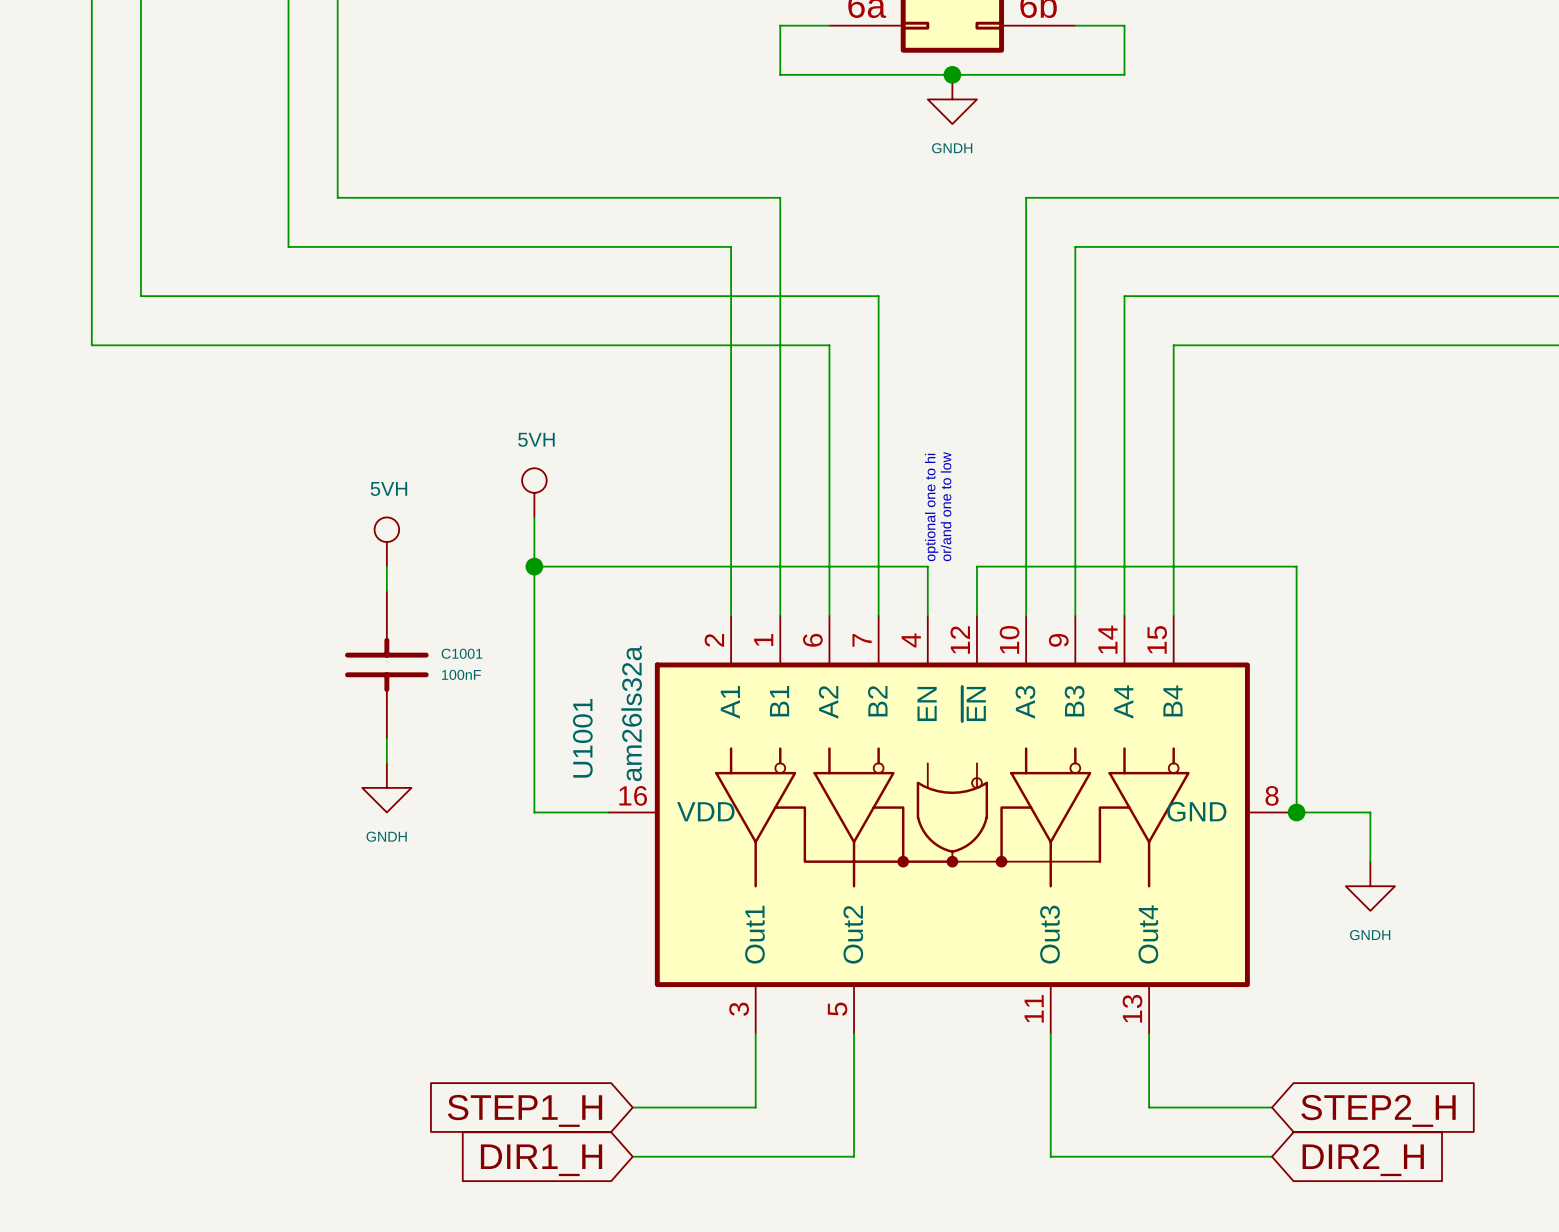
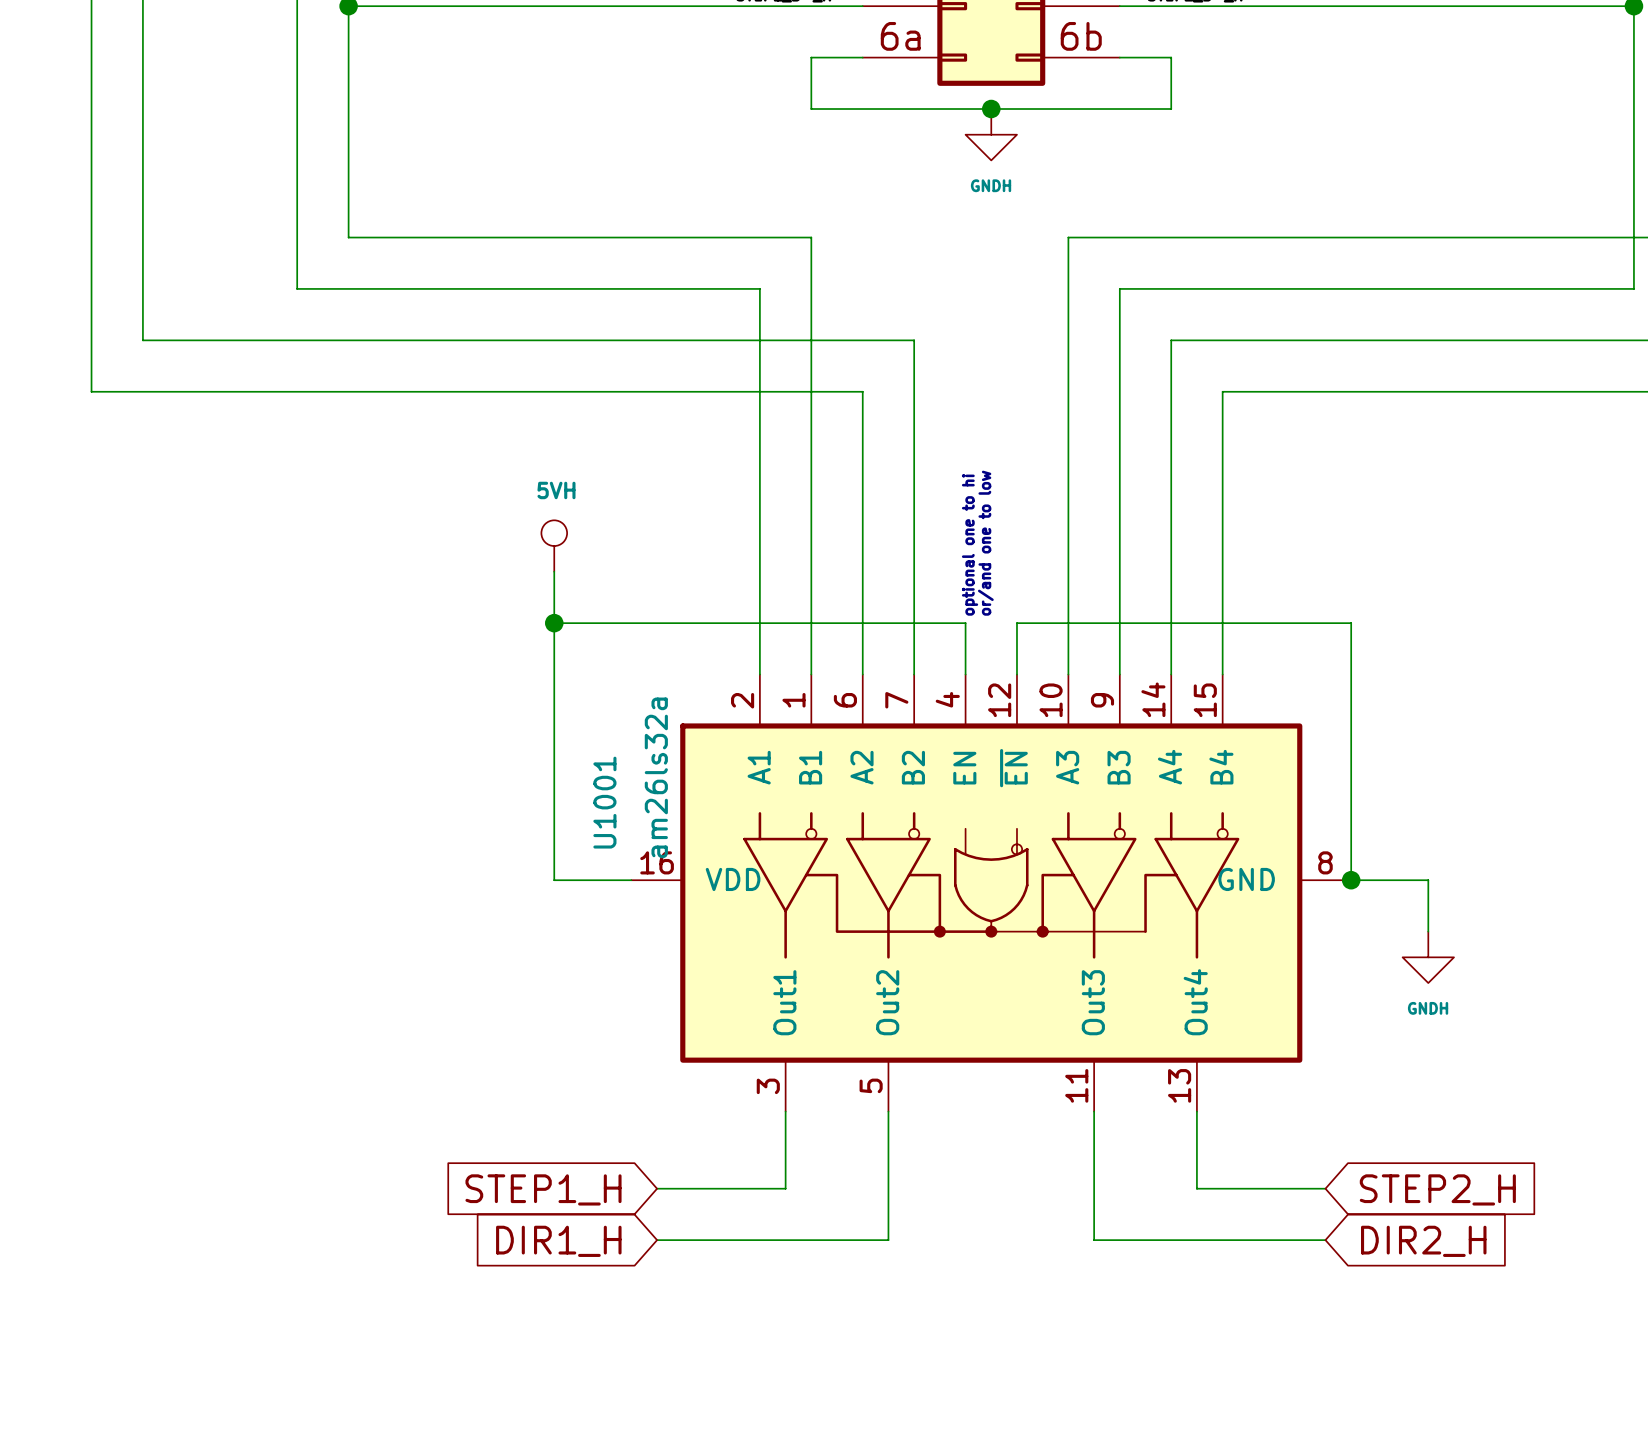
power symbol: 5VH (386, 542) -> none
wire: (386, 566) (386, 591) -> none
C1001: 100nF (386, 664) -> none
wire: (386, 738) (386, 763) -> none
power symbol: GNDH (386, 787) -> none

